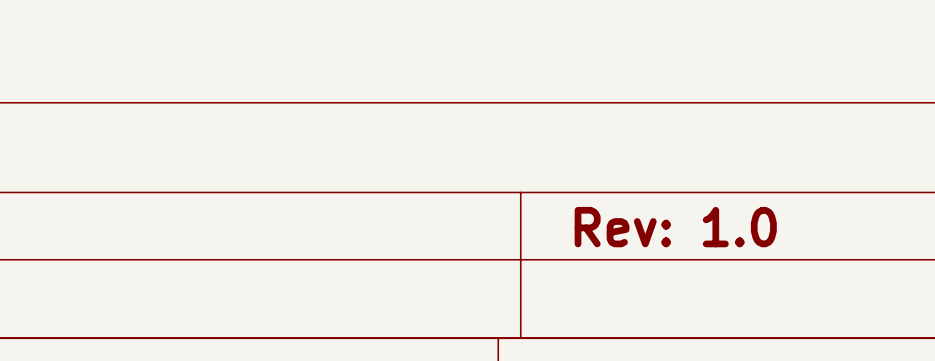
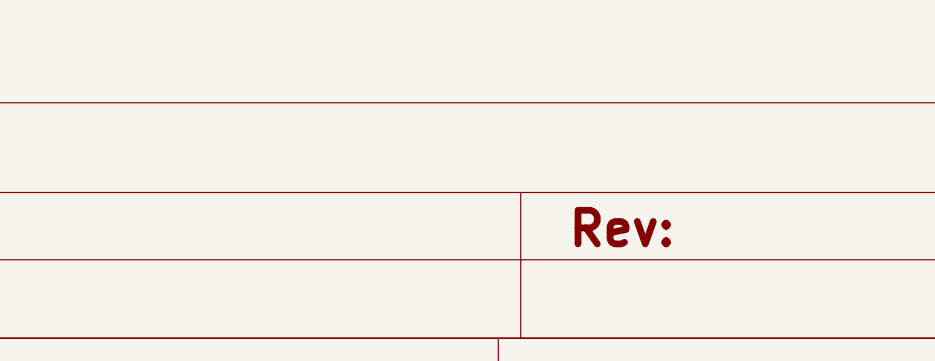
title block: Rev: 1.0 (675, 227) -> Rev: (622, 227)

